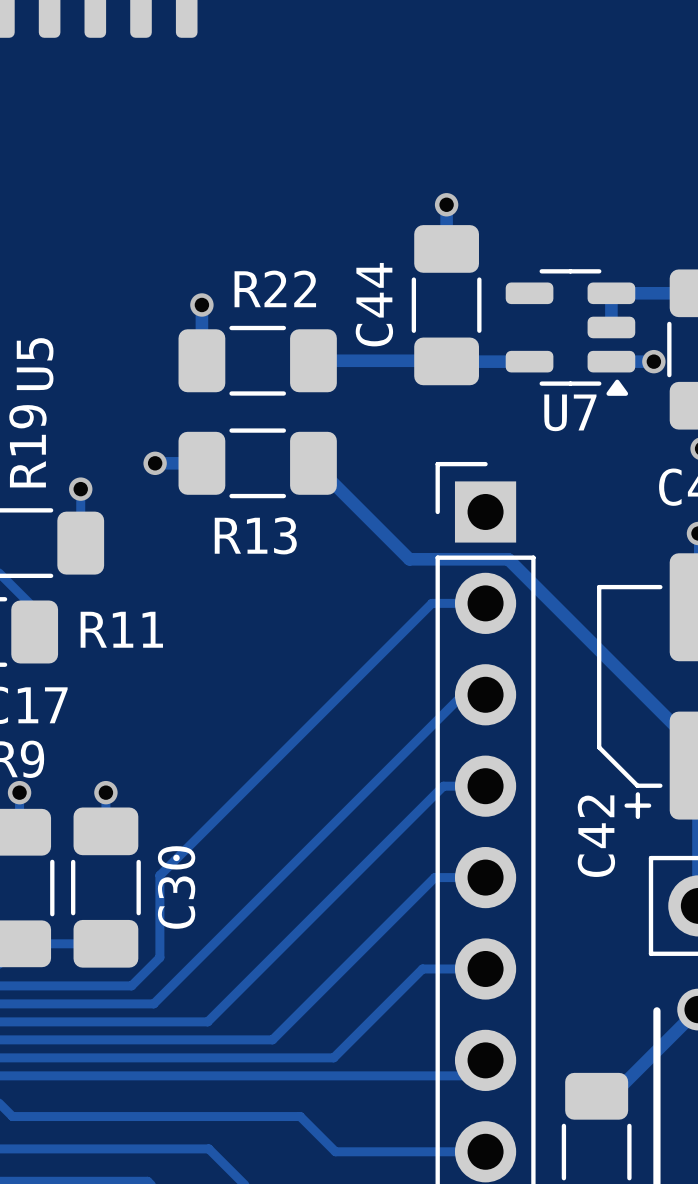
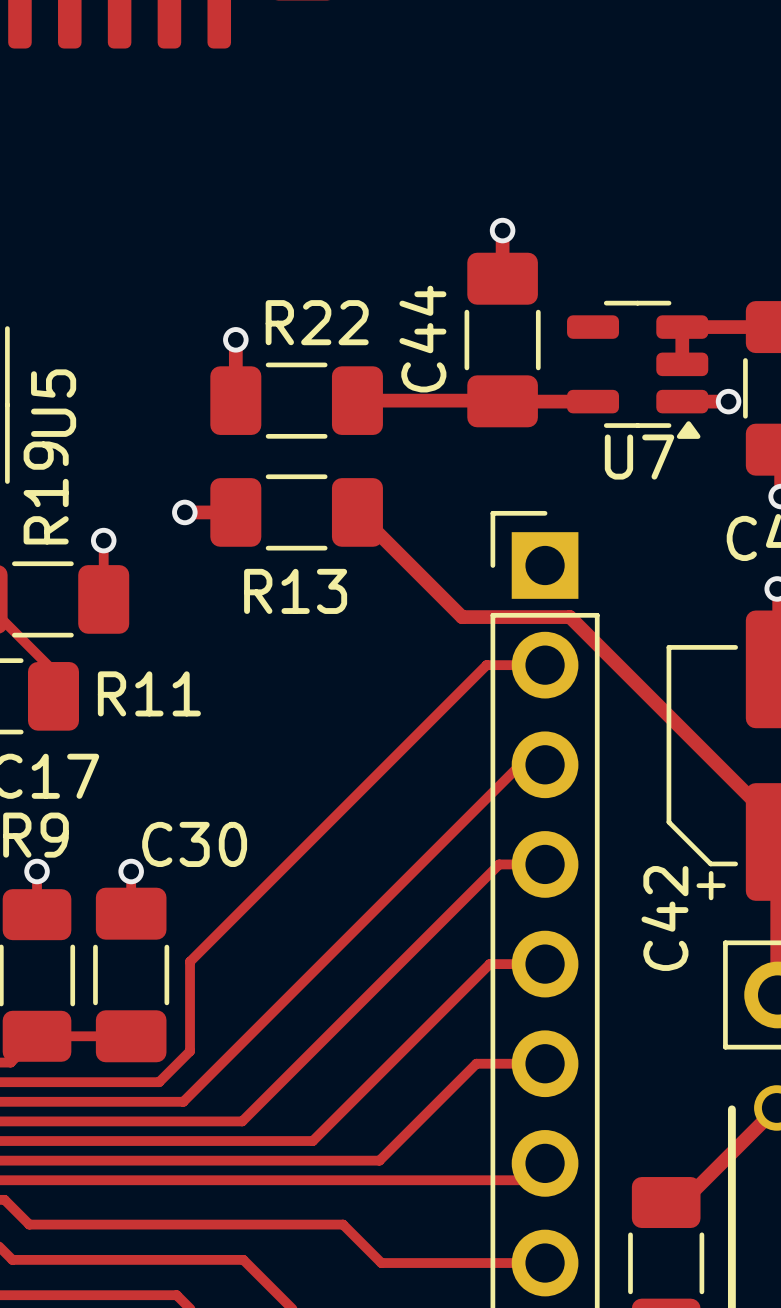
C30 name rotation: 0° (176, 887) -> 90° clockwise (194, 844)

